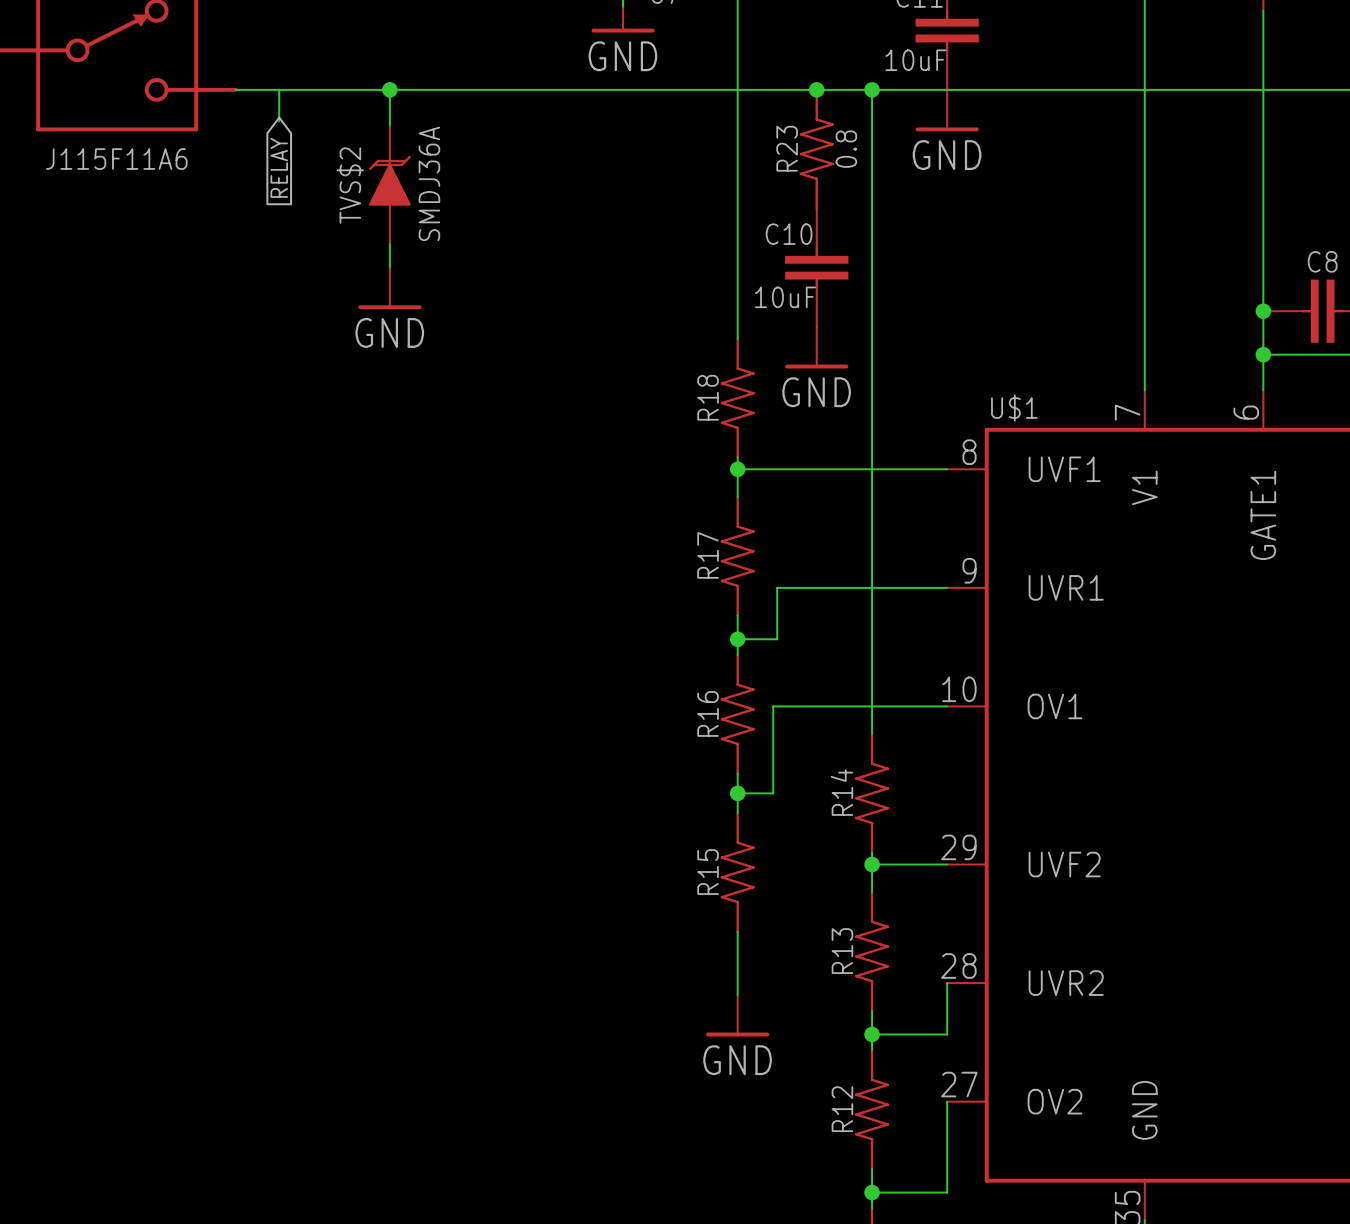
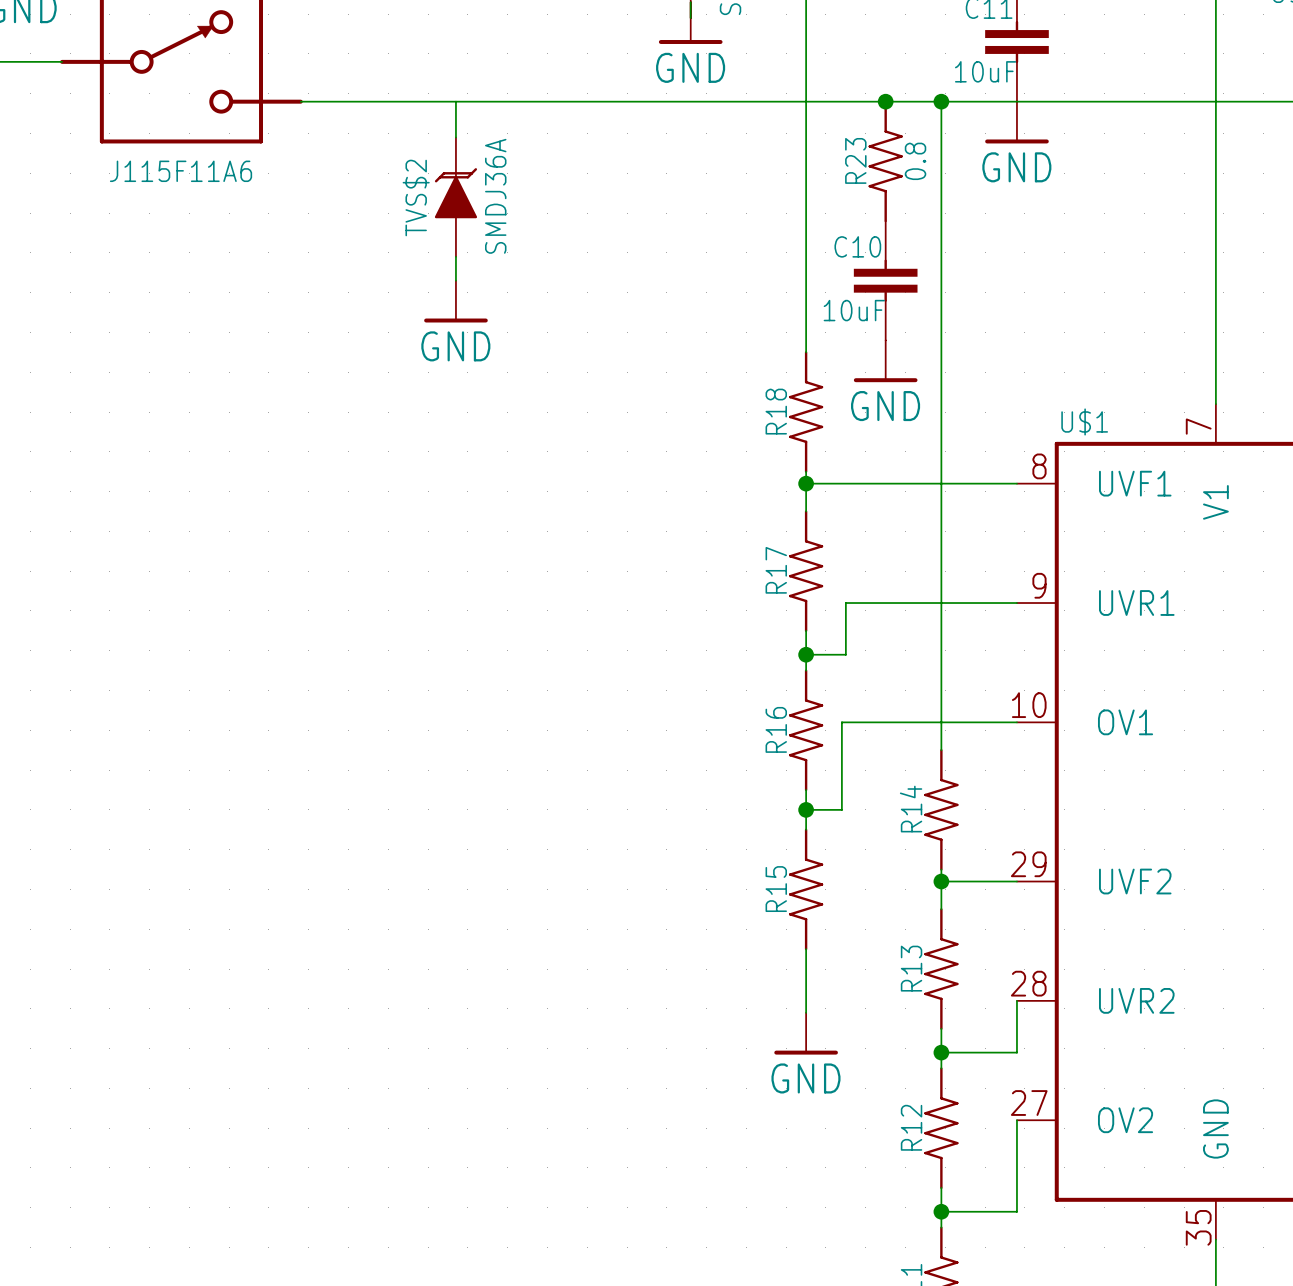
wire: (279, 89) (279, 121) -> none
junction: (389, 89) -> none
global label: RELAY (279, 167) -> none

